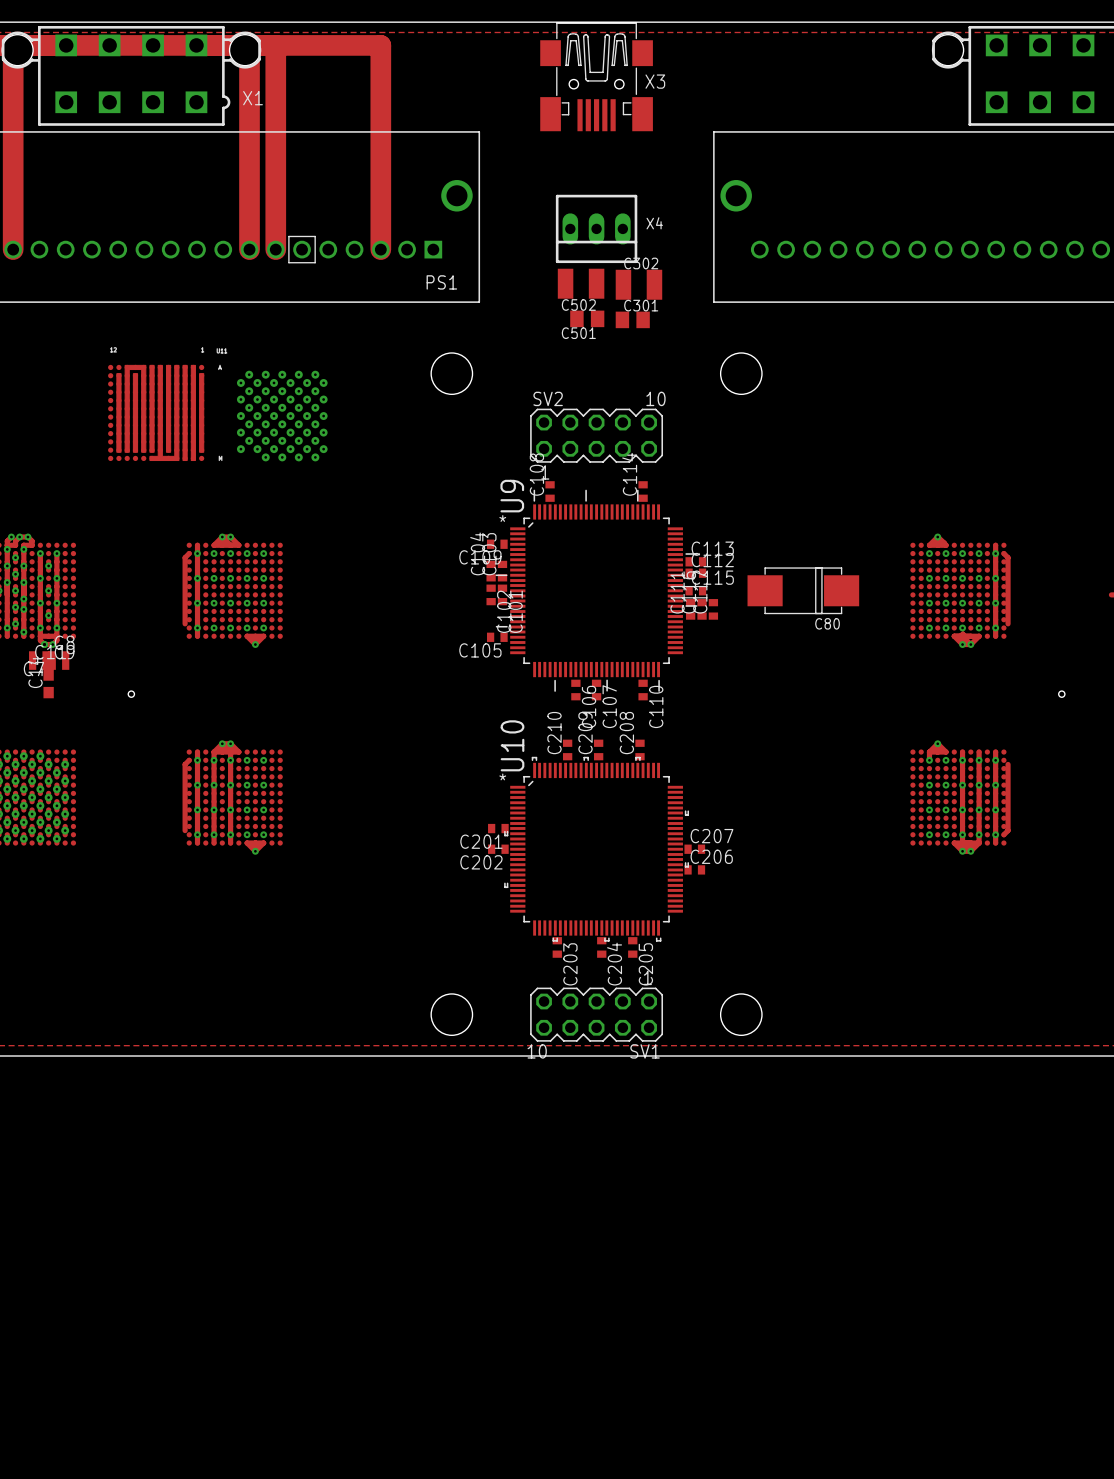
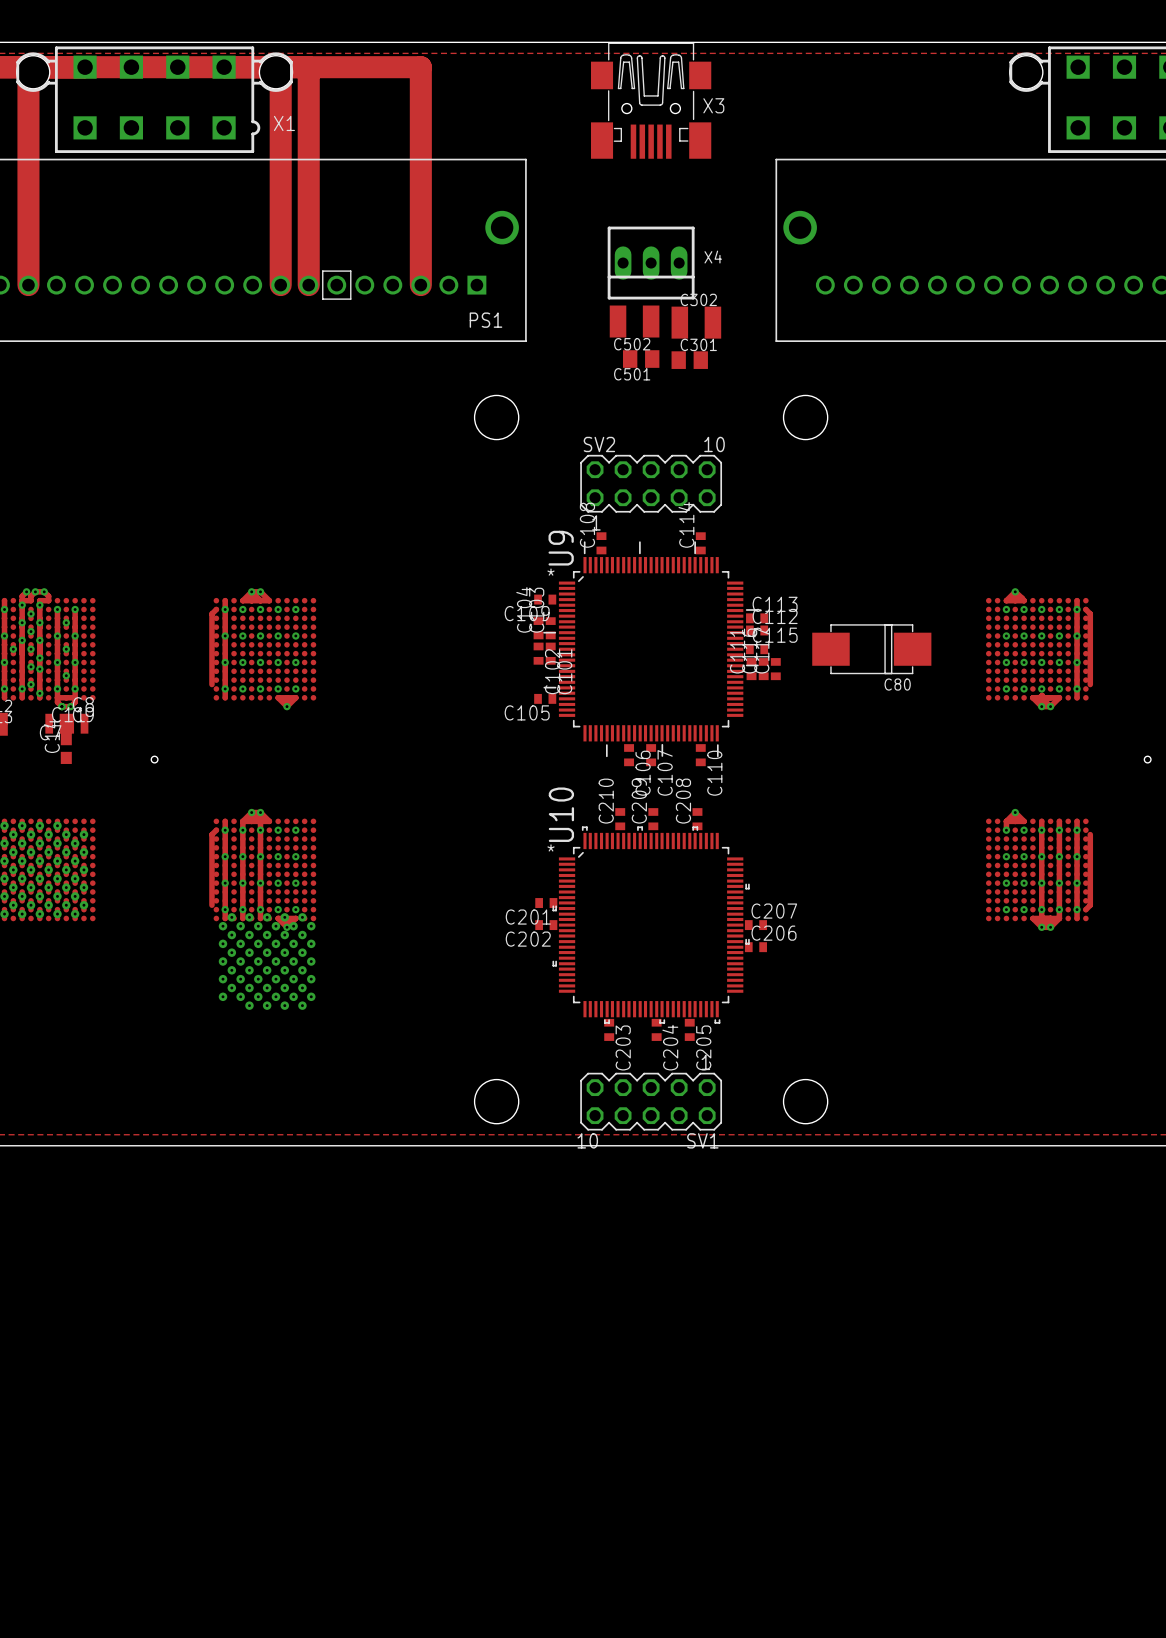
part: (156, 412) -> none
part: (282, 416) -> none
part: none -> (267, 961)

